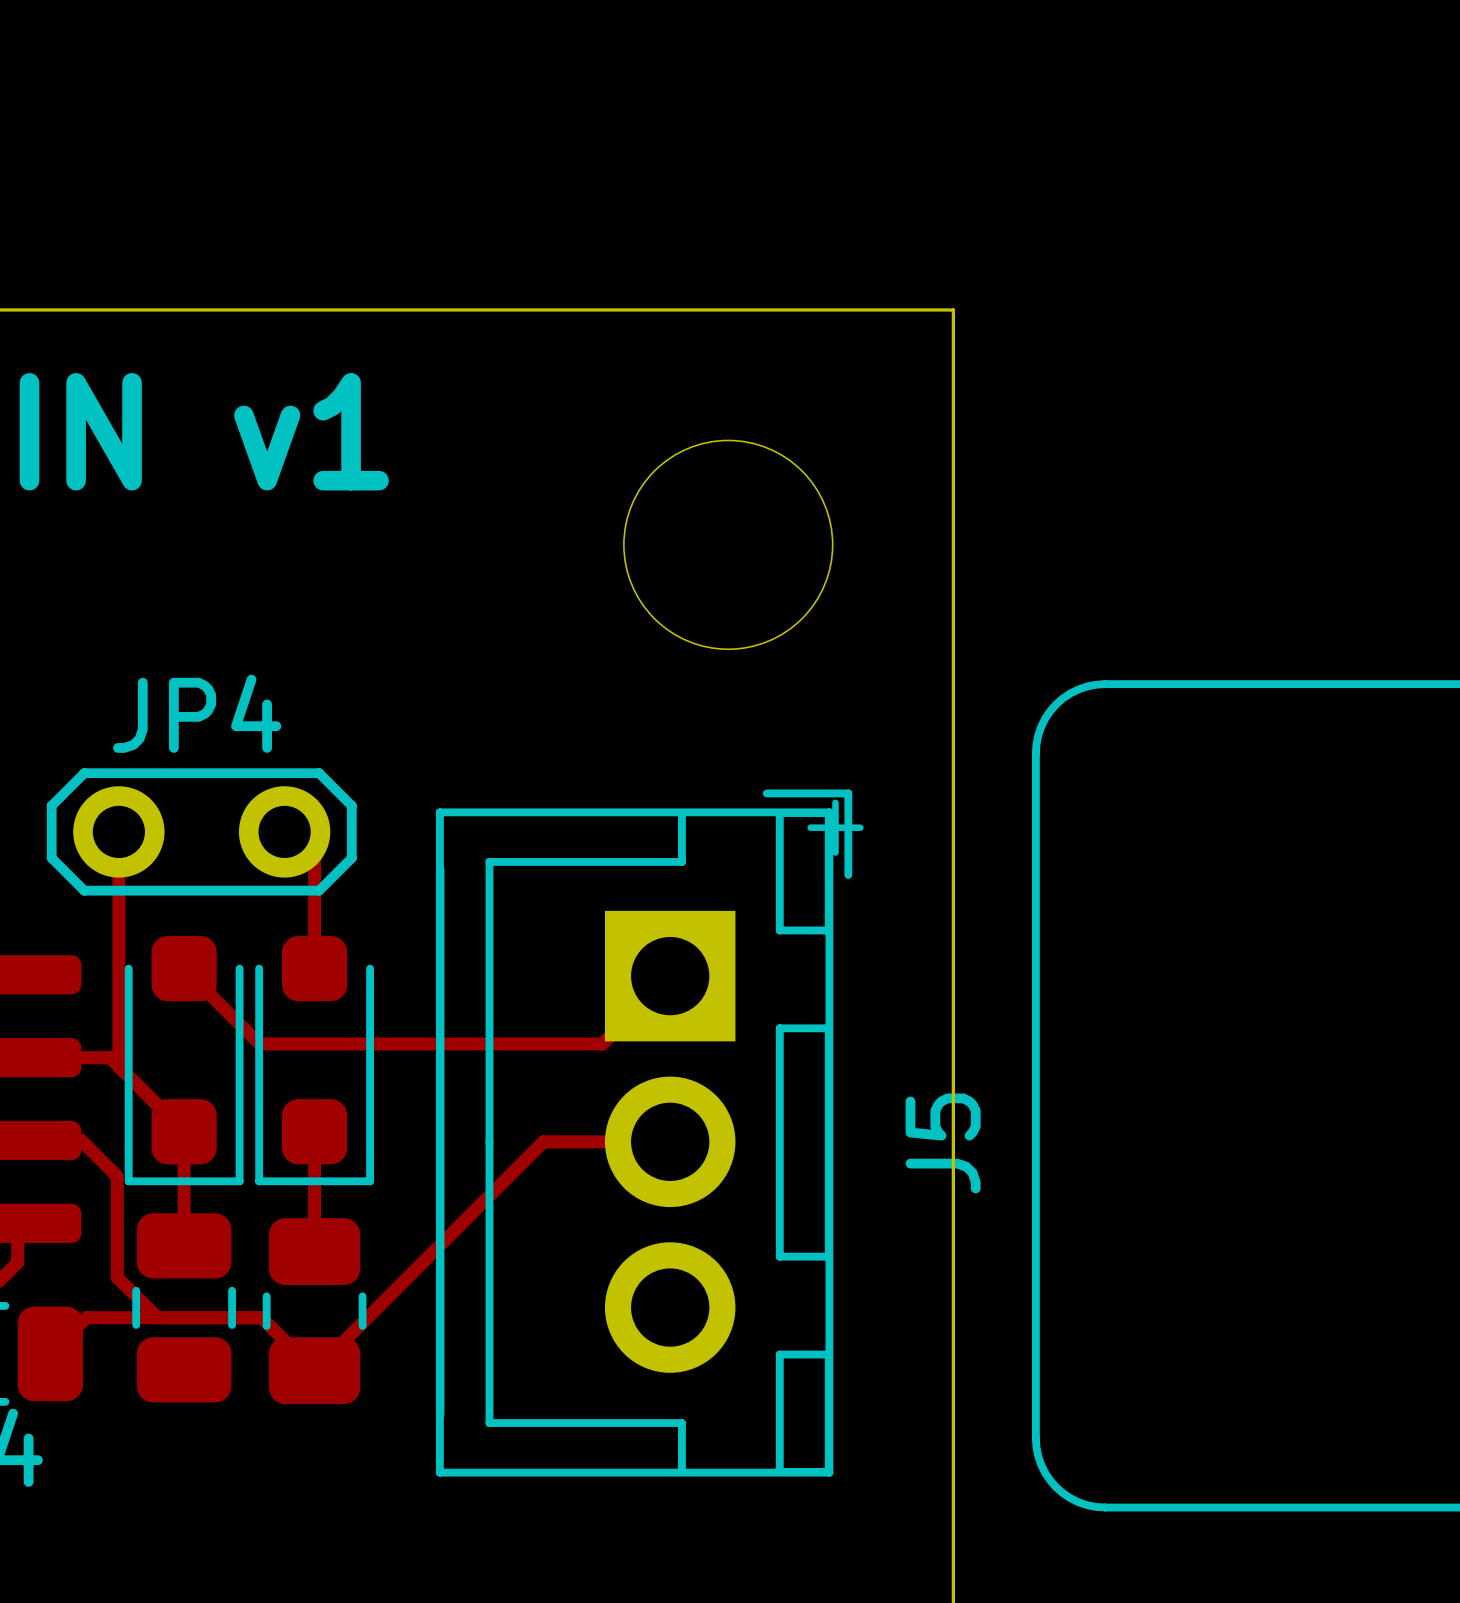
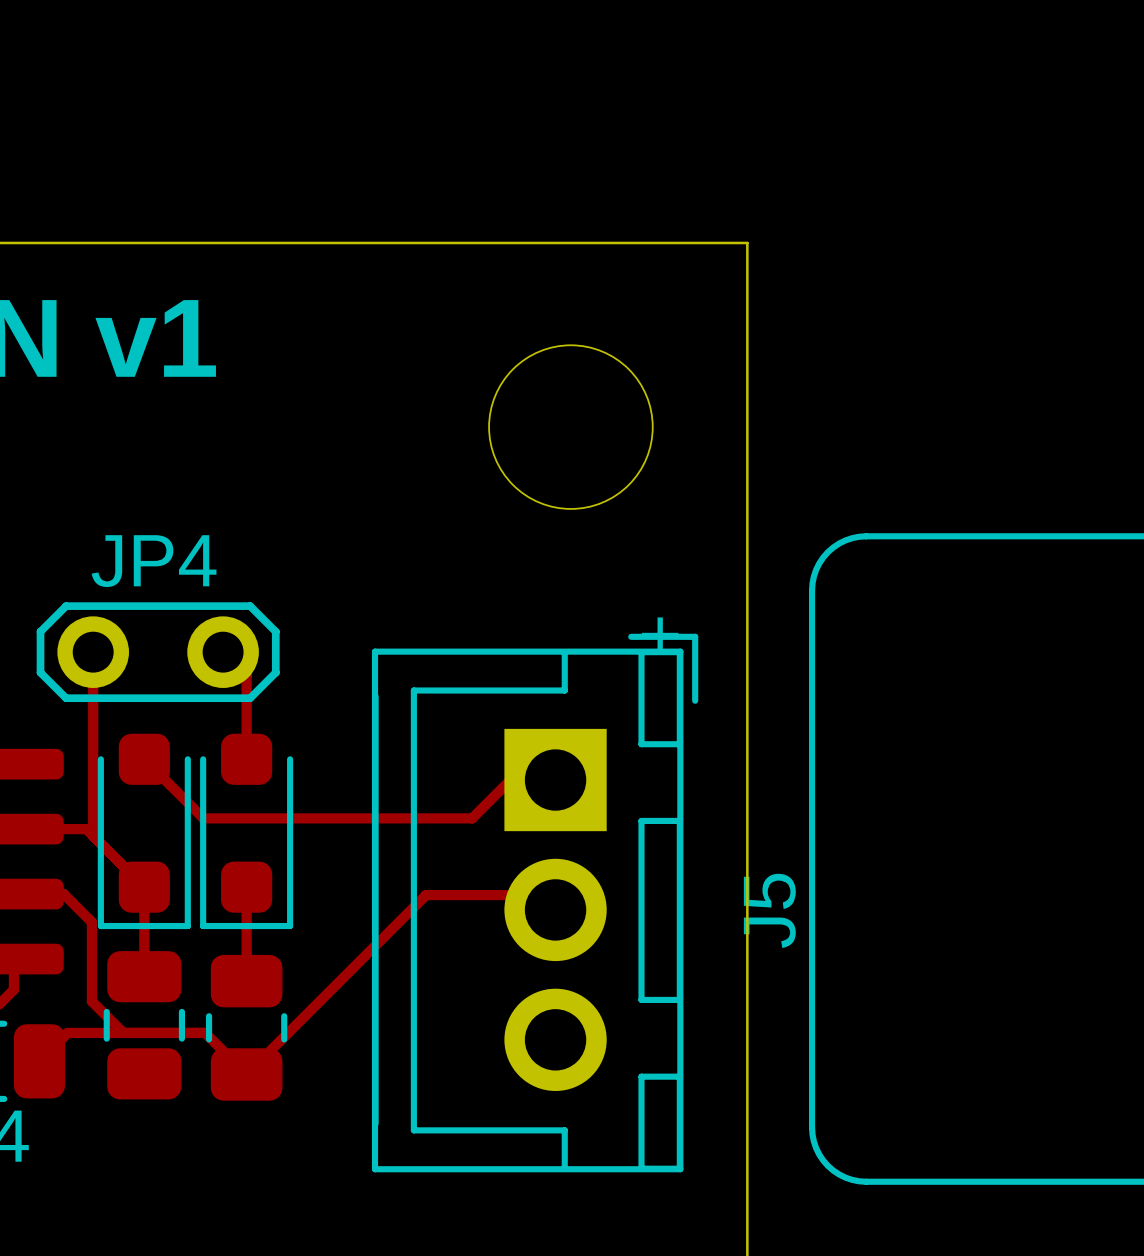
J5 position: (644, 1133) -> (535, 903)

